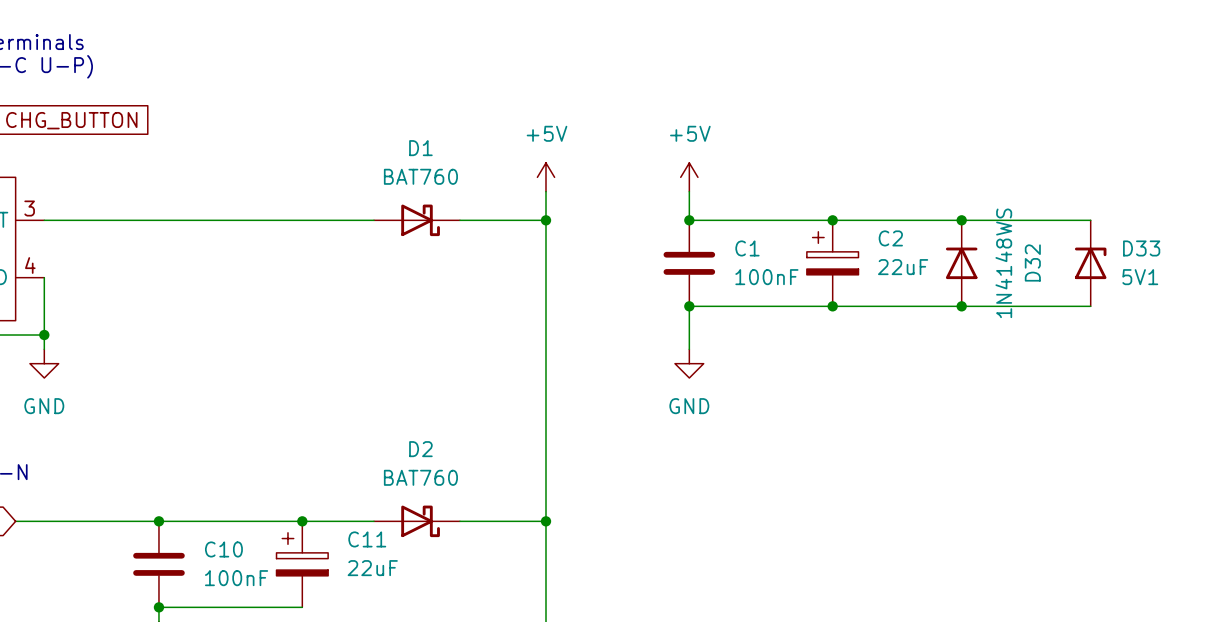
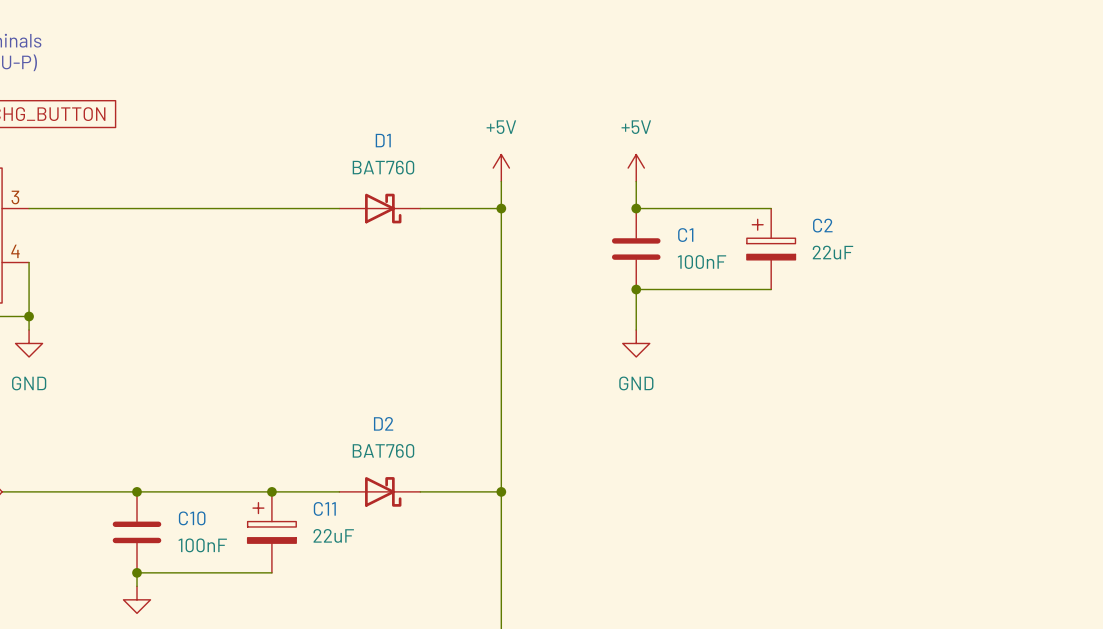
wire: (832, 220) (1090, 220) -> none
junction: (832, 220) -> none
junction: (961, 220) -> none
D32: 1N4148WS (961, 263) -> none
D33: 5V1 (1090, 263) -> none
wire: (832, 306) (1090, 306) -> none
junction: (832, 306) -> none
junction: (961, 306) -> none

